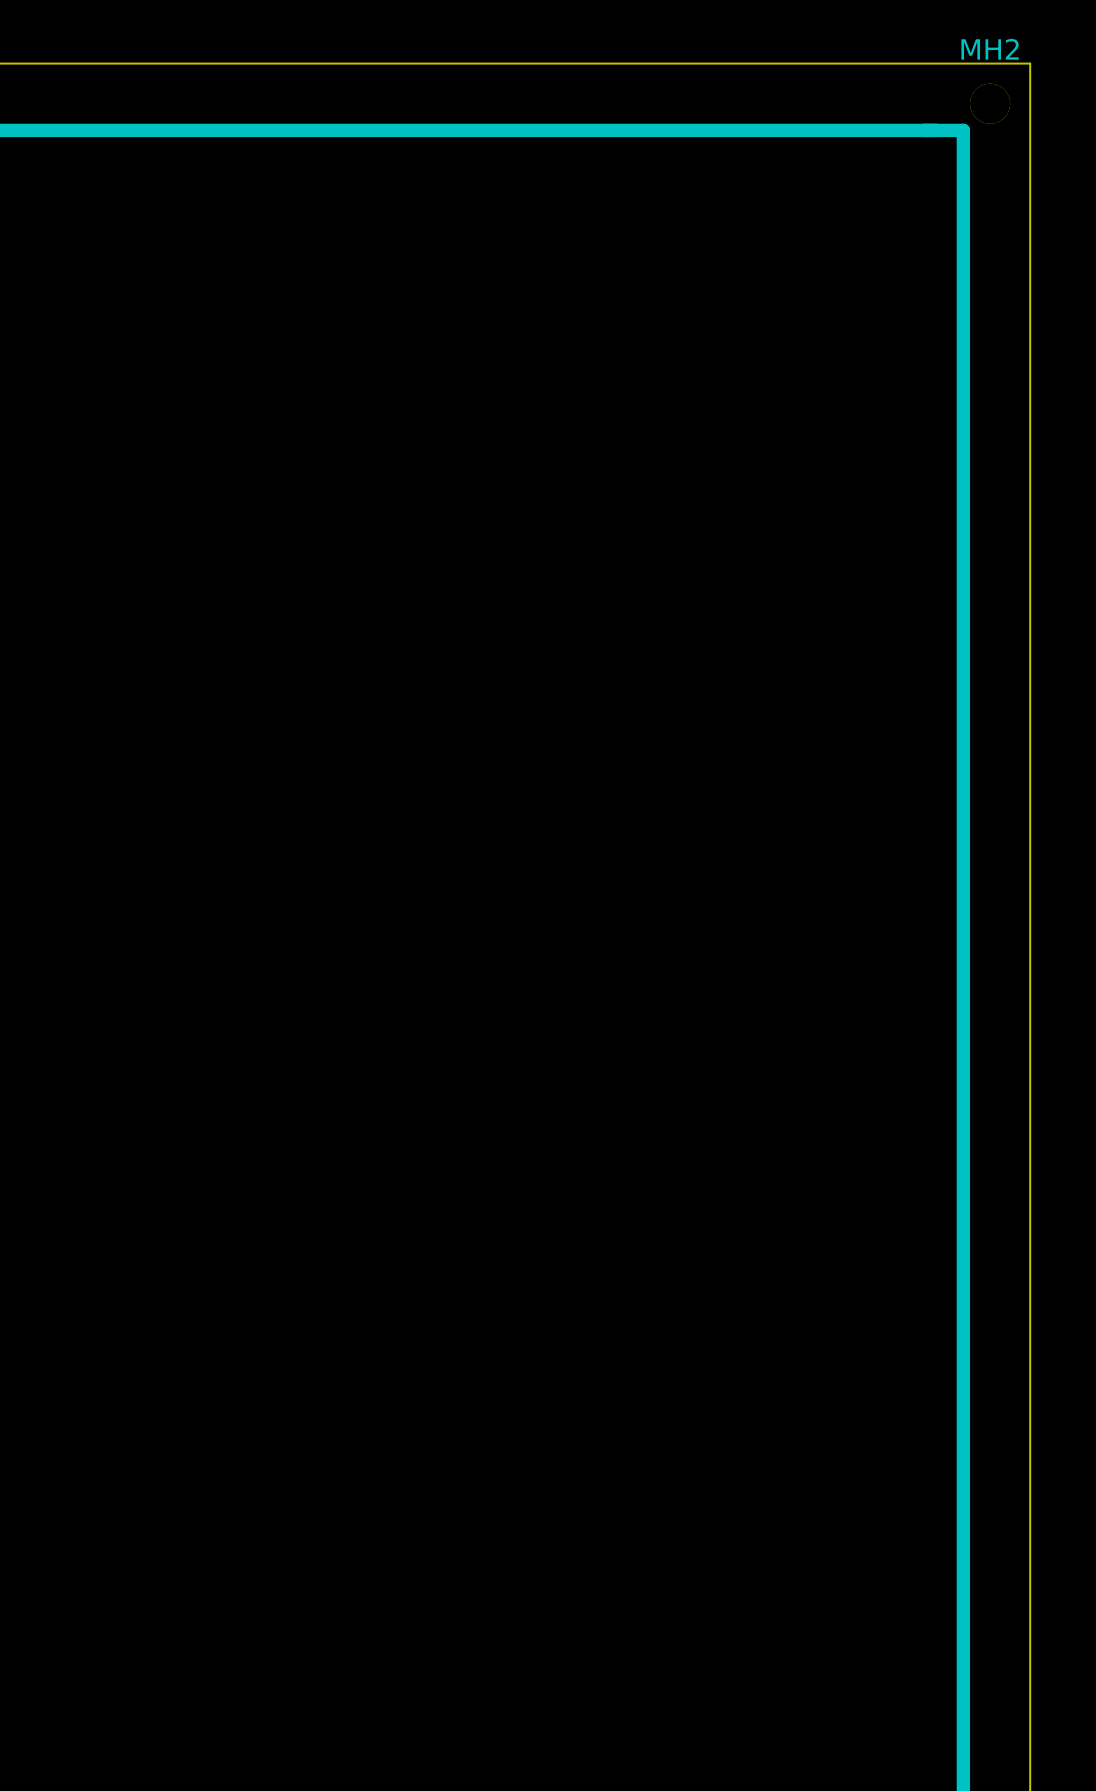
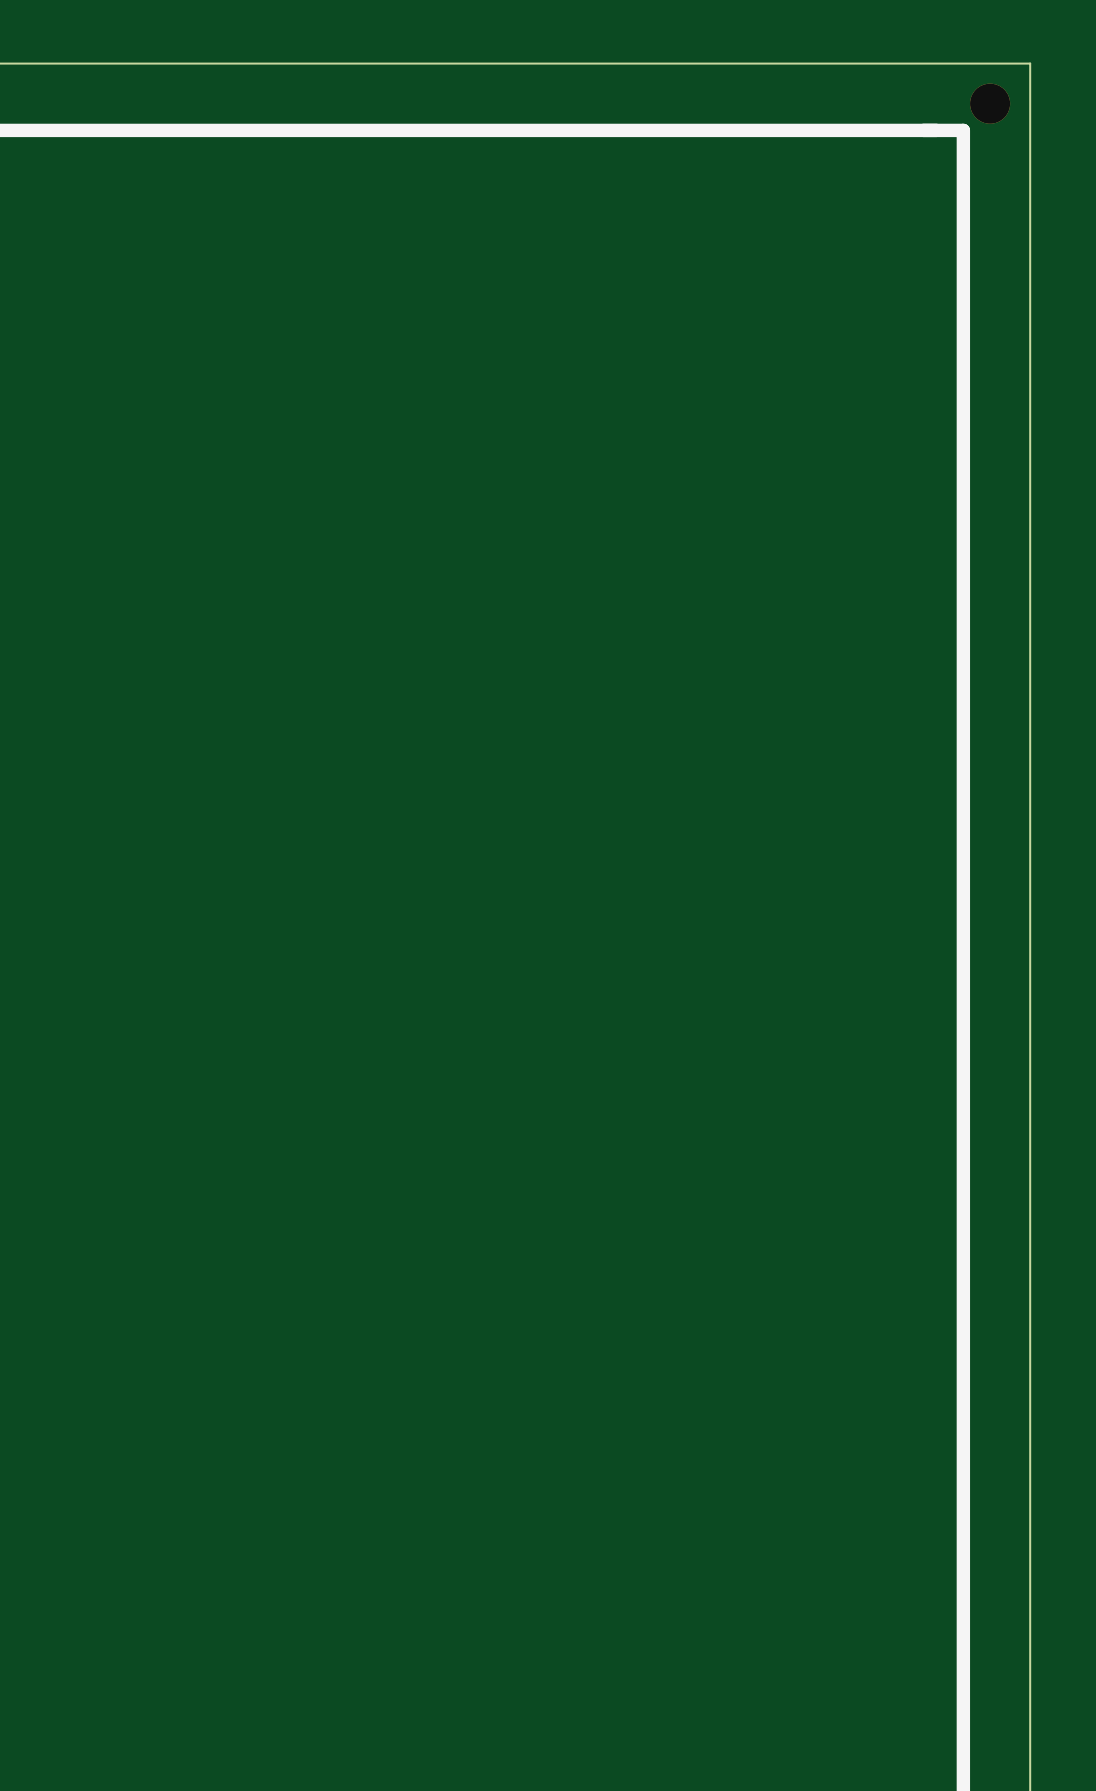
MH2 name: MH2 (990, 49) -> none

